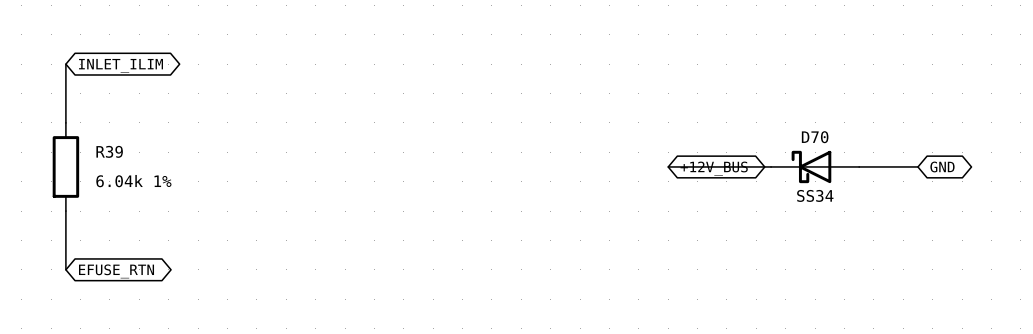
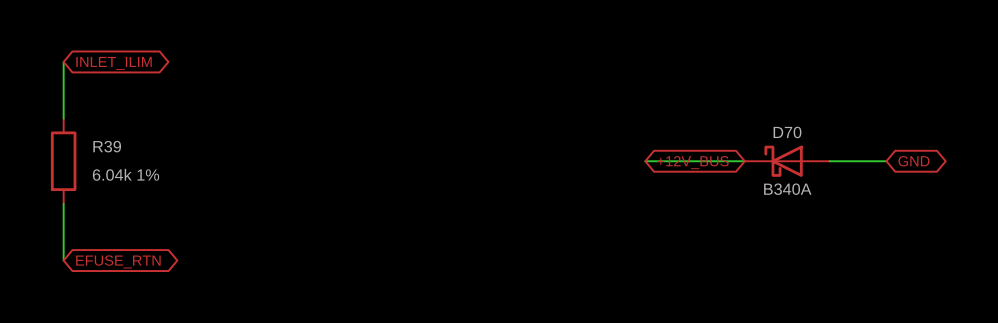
D70 value: SS34 (815, 195) -> B340A (787, 189)

